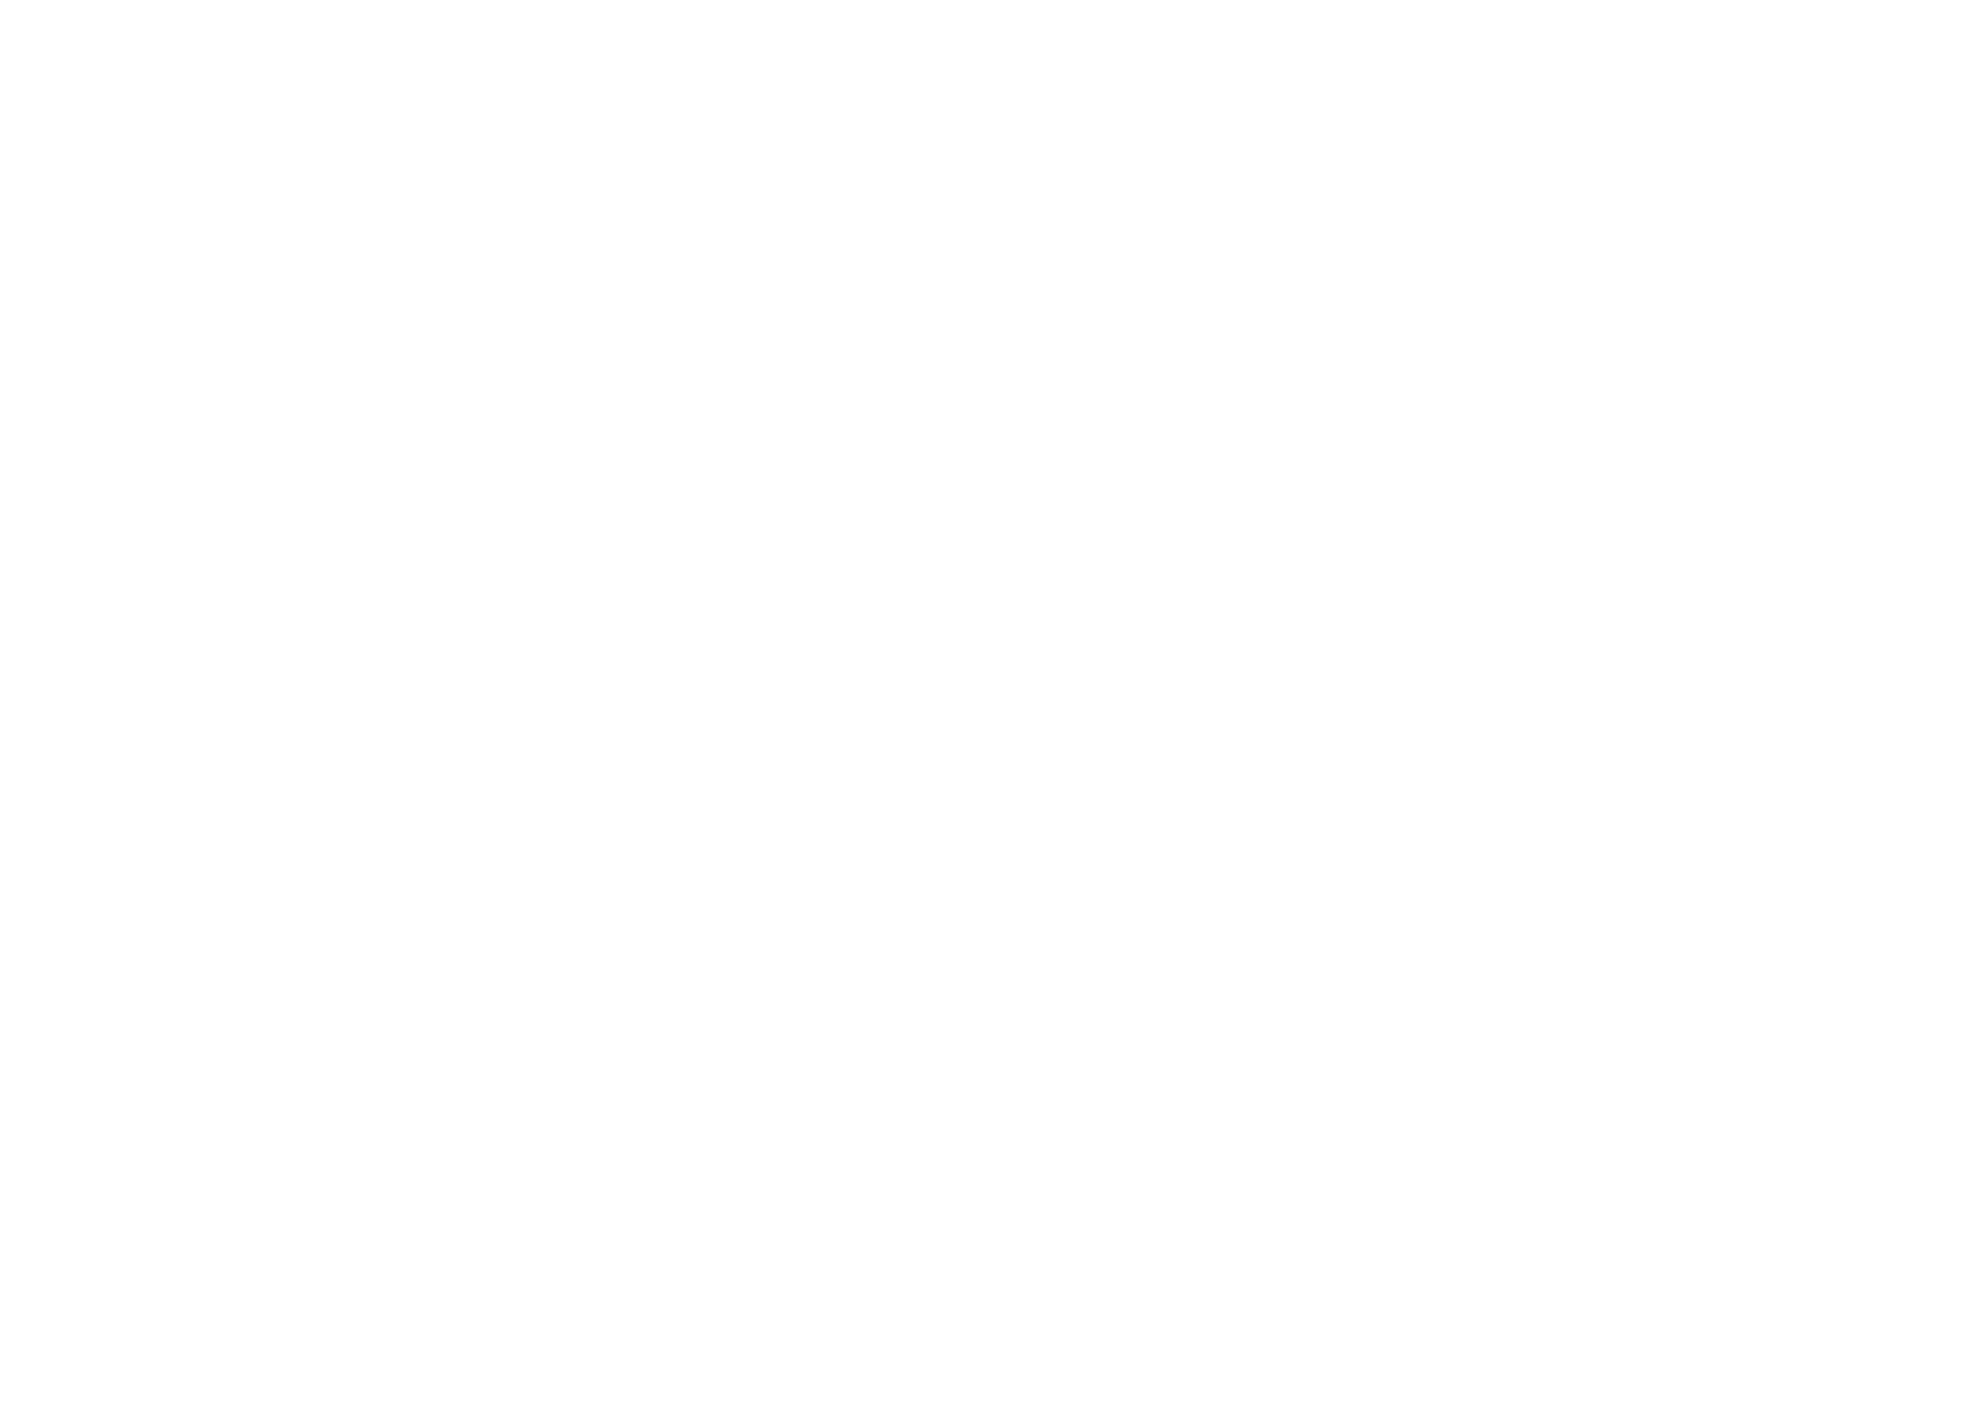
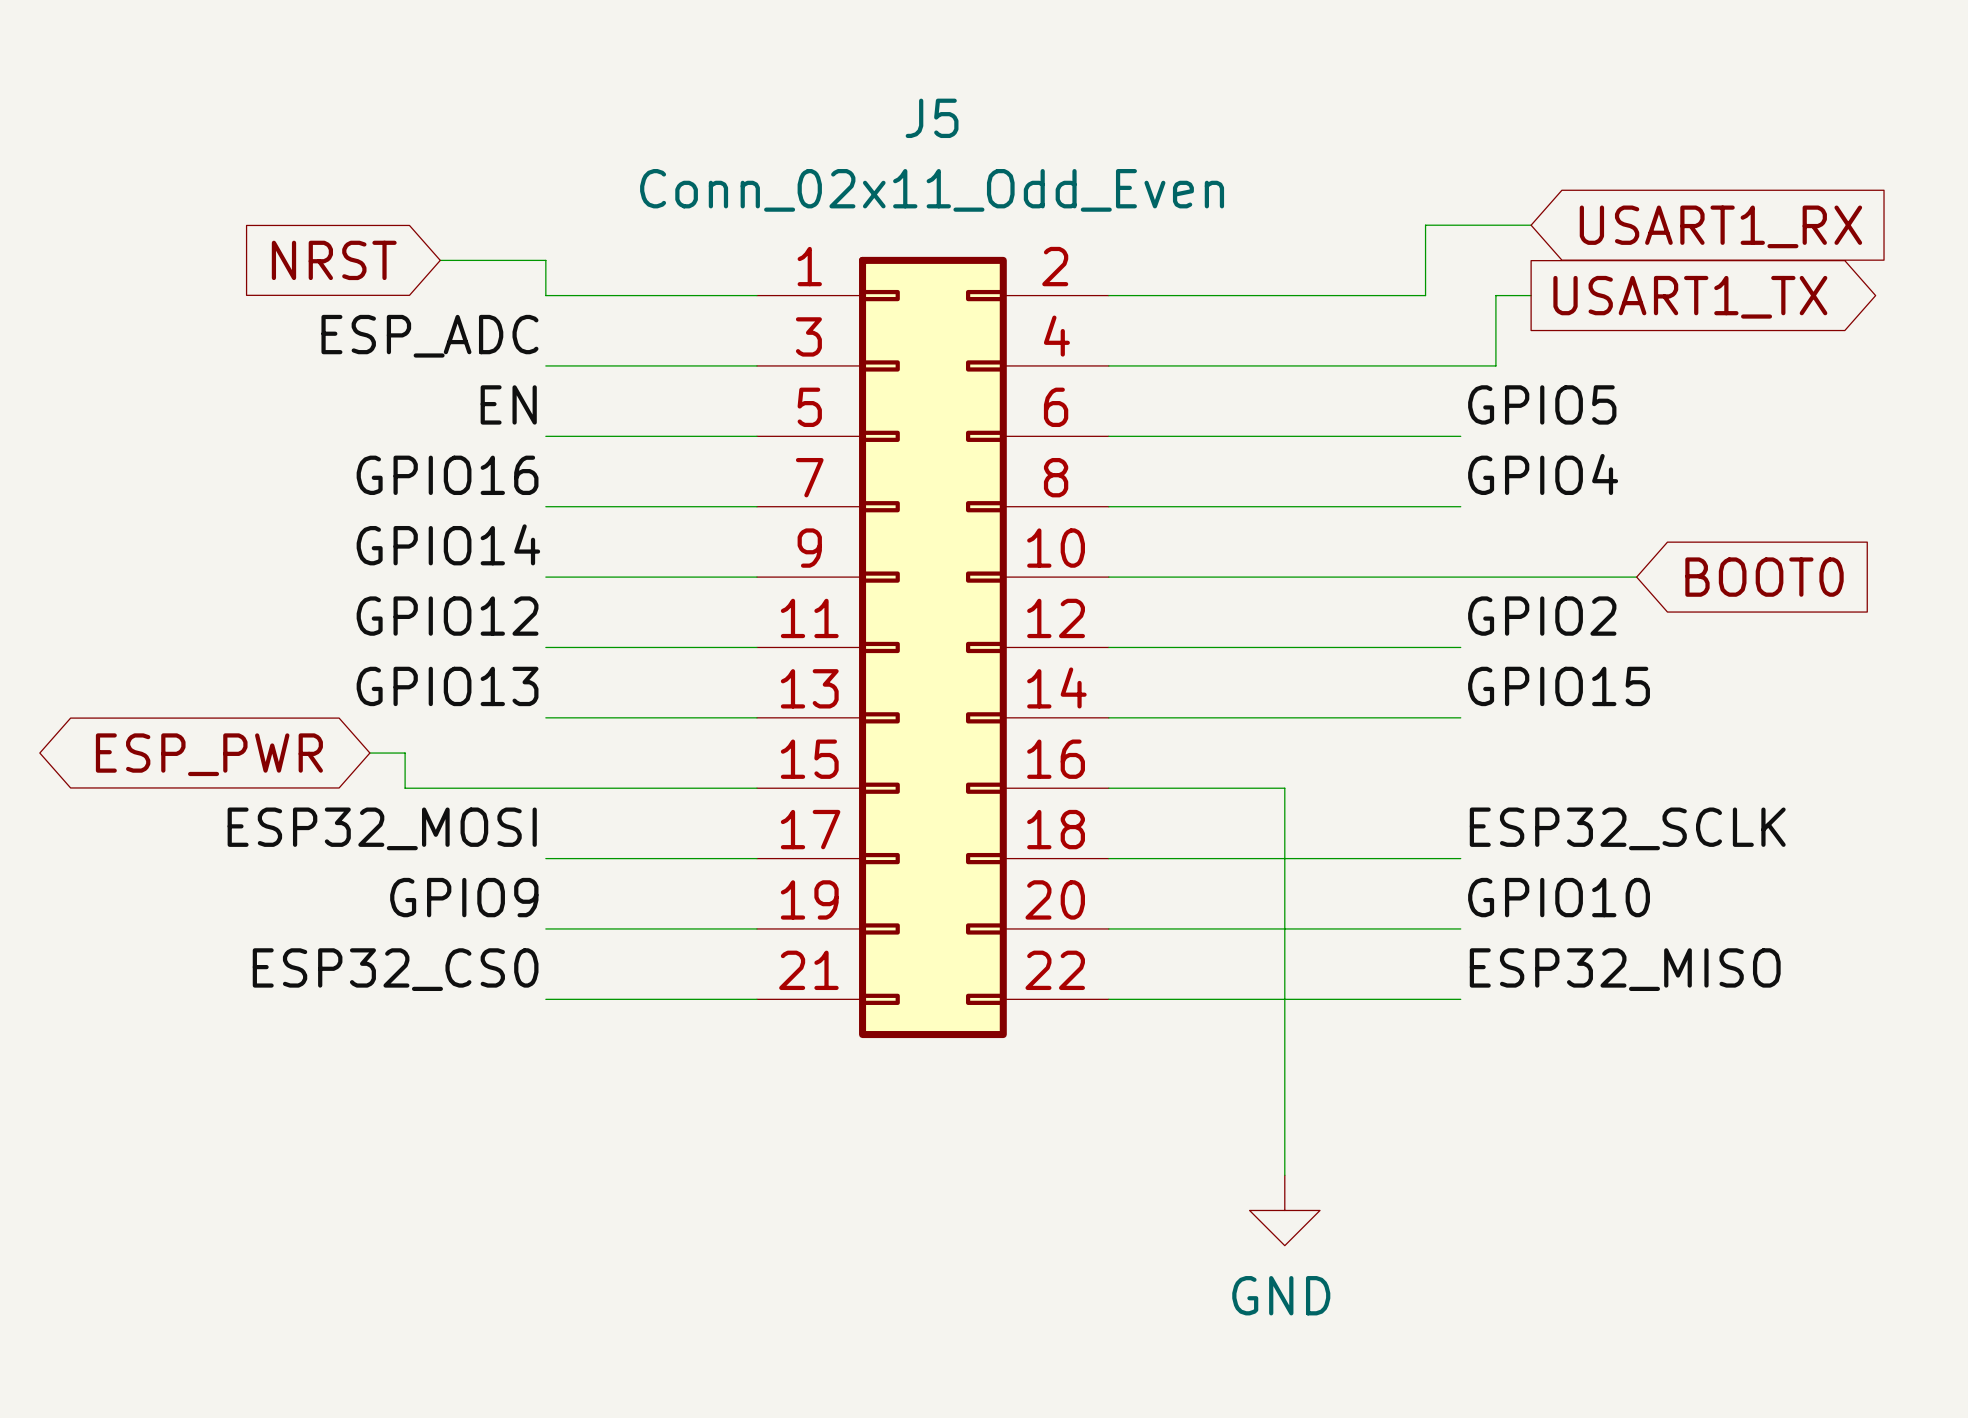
wire: none -> (1531, 225) (1425, 225) (1425, 295) (1108, 295)
global label: none -> USART1_RX (1720, 226)
global label: none -> NRST (334, 260)
wire: none -> (440, 260) (545, 260) (545, 295) (756, 295)
wire: none -> (1531, 295) (1495, 295) (1495, 365) (1108, 365)
global label: none -> USART1_TX (1690, 297)
label: none -> ESP_ADC (429, 336)
wire: none -> (545, 365) (756, 365)
label: none -> EN (508, 404)
label: none -> GPIO5 (1542, 404)
wire: none -> (545, 436) (756, 436)
wire: none -> (1108, 436) (1460, 436)
label: none -> GPIO4 (1543, 474)
label: none -> GPIO16 (447, 475)
wire: none -> (545, 506) (756, 506)
wire: none -> (1108, 506) (1460, 506)
label: none -> GPIO14 (448, 544)
wire: none -> (545, 577) (756, 577)
wire: none -> (1108, 577) (1636, 577)
global label: none -> BOOT0 (1764, 577)
label: none -> GPIO12 (447, 616)
label: none -> GPIO2 (1542, 616)
wire: none -> (545, 647) (756, 647)
J5: none -> Conn_02x11_Odd_Even (932, 647)
wire: none -> (1108, 647) (1460, 647)
label: none -> GPIO13 (447, 686)
label: none -> GPIO15 (1559, 686)
wire: none -> (545, 717) (756, 717)
wire: none -> (1108, 717) (1460, 717)
wire: none -> (369, 753) (405, 753) (405, 788) (756, 788)
global label: none -> ESP_PWR (209, 754)
wire: none -> (1108, 788) (1284, 788) (1284, 1175)
label: none -> ESP32_MOSI (382, 828)
label: none -> ESP32_SCLK (1627, 828)
wire: none -> (545, 858) (756, 858)
wire: none -> (1108, 858) (1460, 858)
label: none -> GPIO9 (464, 897)
label: none -> GPIO10 (1559, 897)
wire: none -> (545, 928) (756, 928)
wire: none -> (1108, 928) (1460, 928)
label: none -> ESP32_CS0 (395, 969)
label: none -> ESP32_MISO (1625, 969)
wire: none -> (545, 999) (756, 999)
wire: none -> (1108, 999) (1460, 999)
power symbol: none -> GND (1284, 1210)

